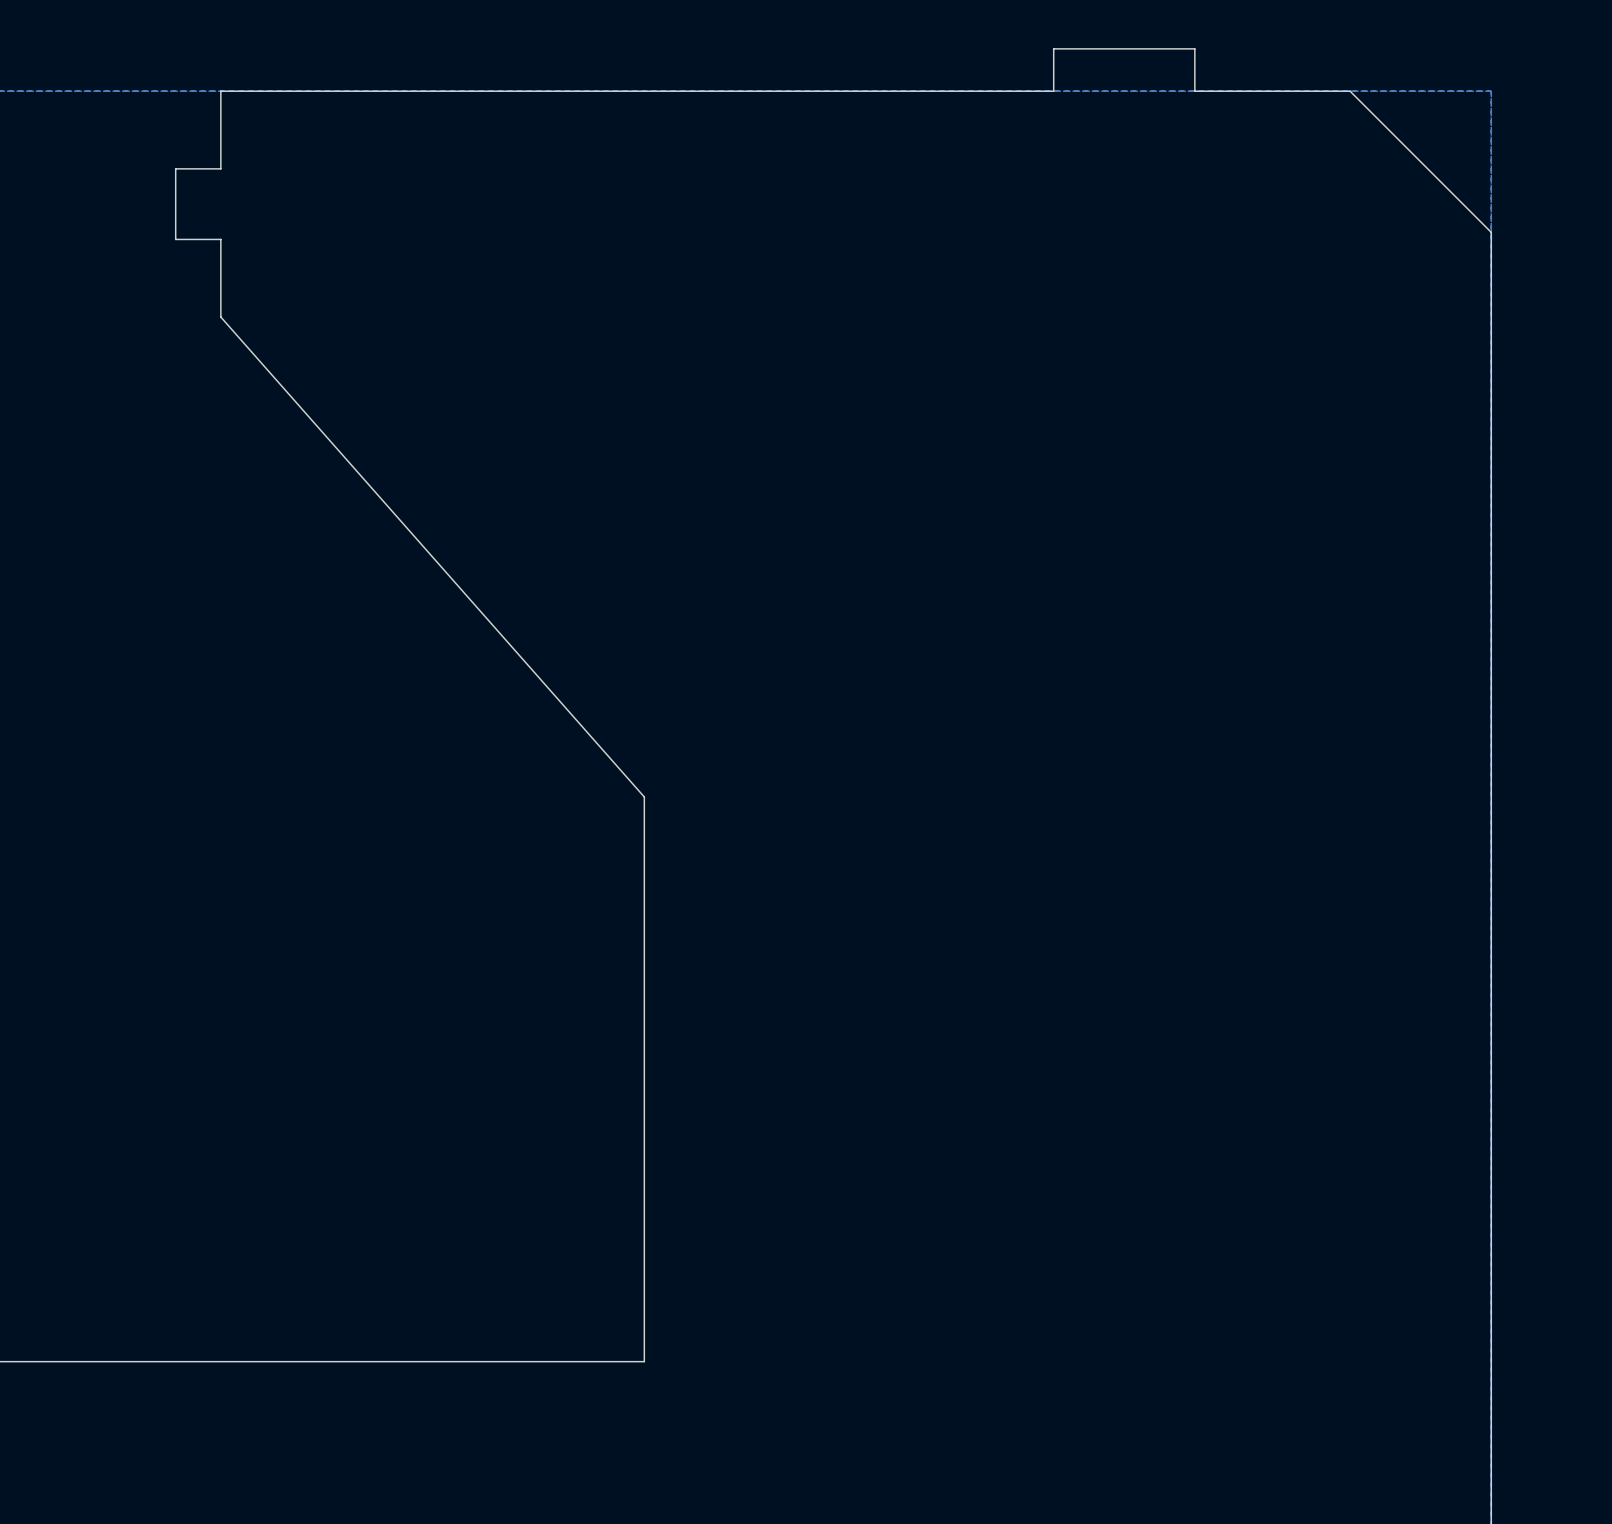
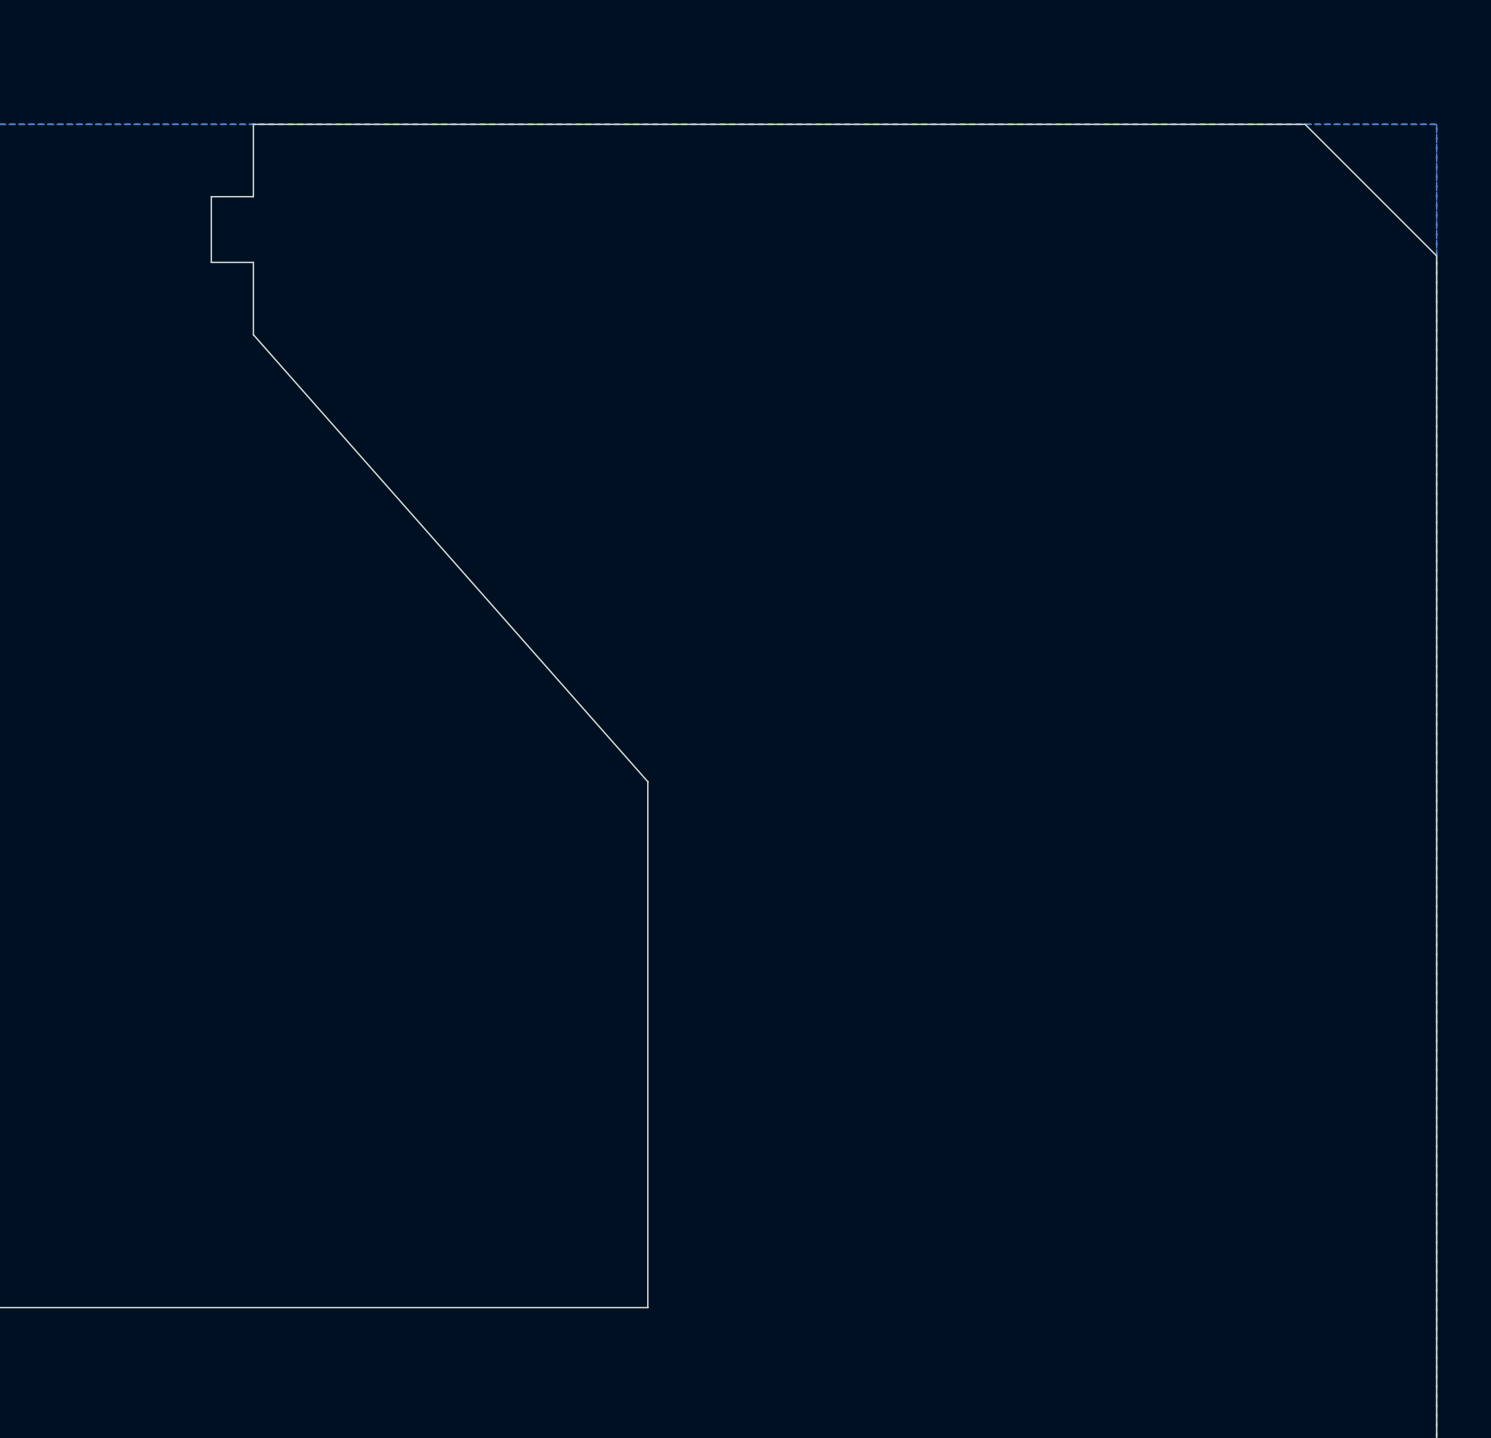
board edge: (1194, 91) (1194, 48) (1053, 48) (1053, 91) -> (1160, 124) (1029, 124)

